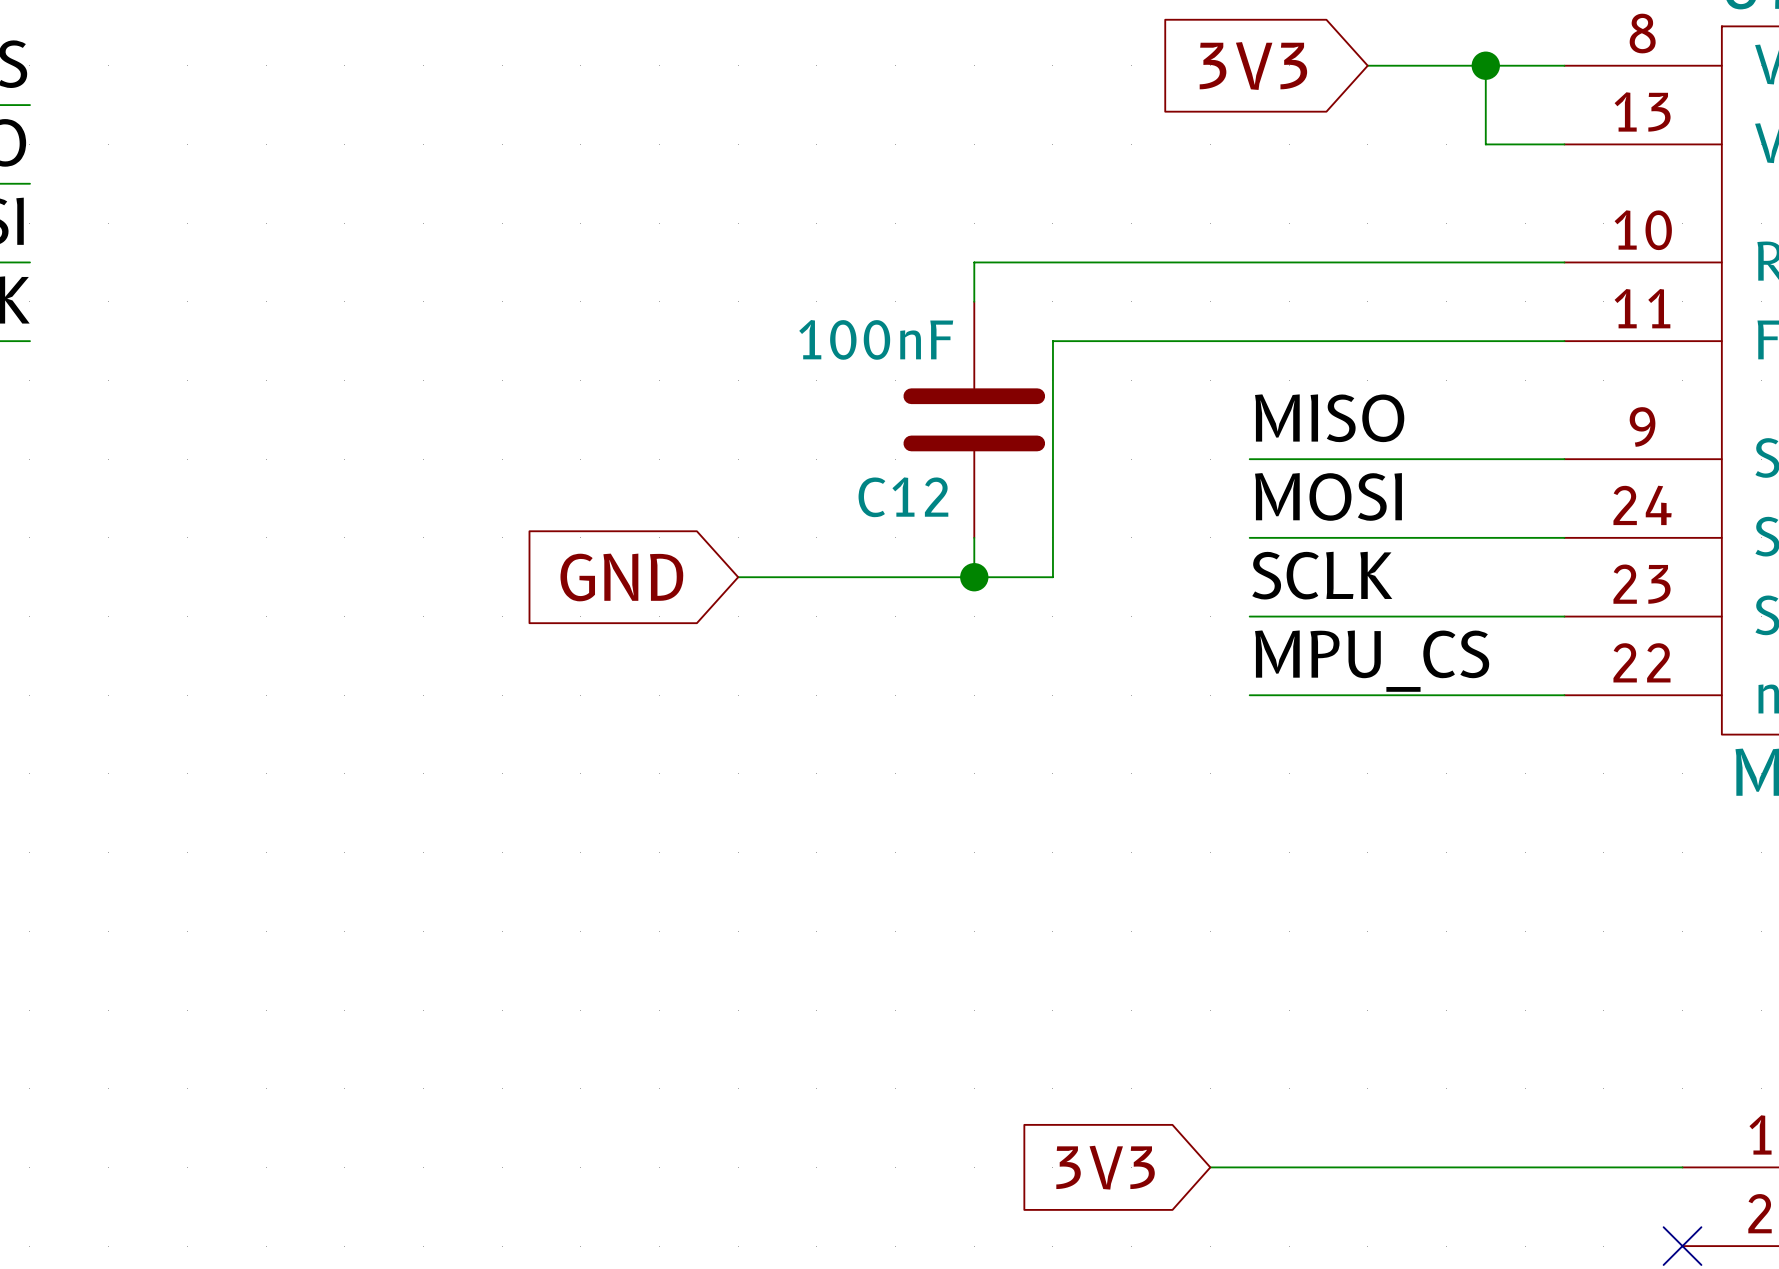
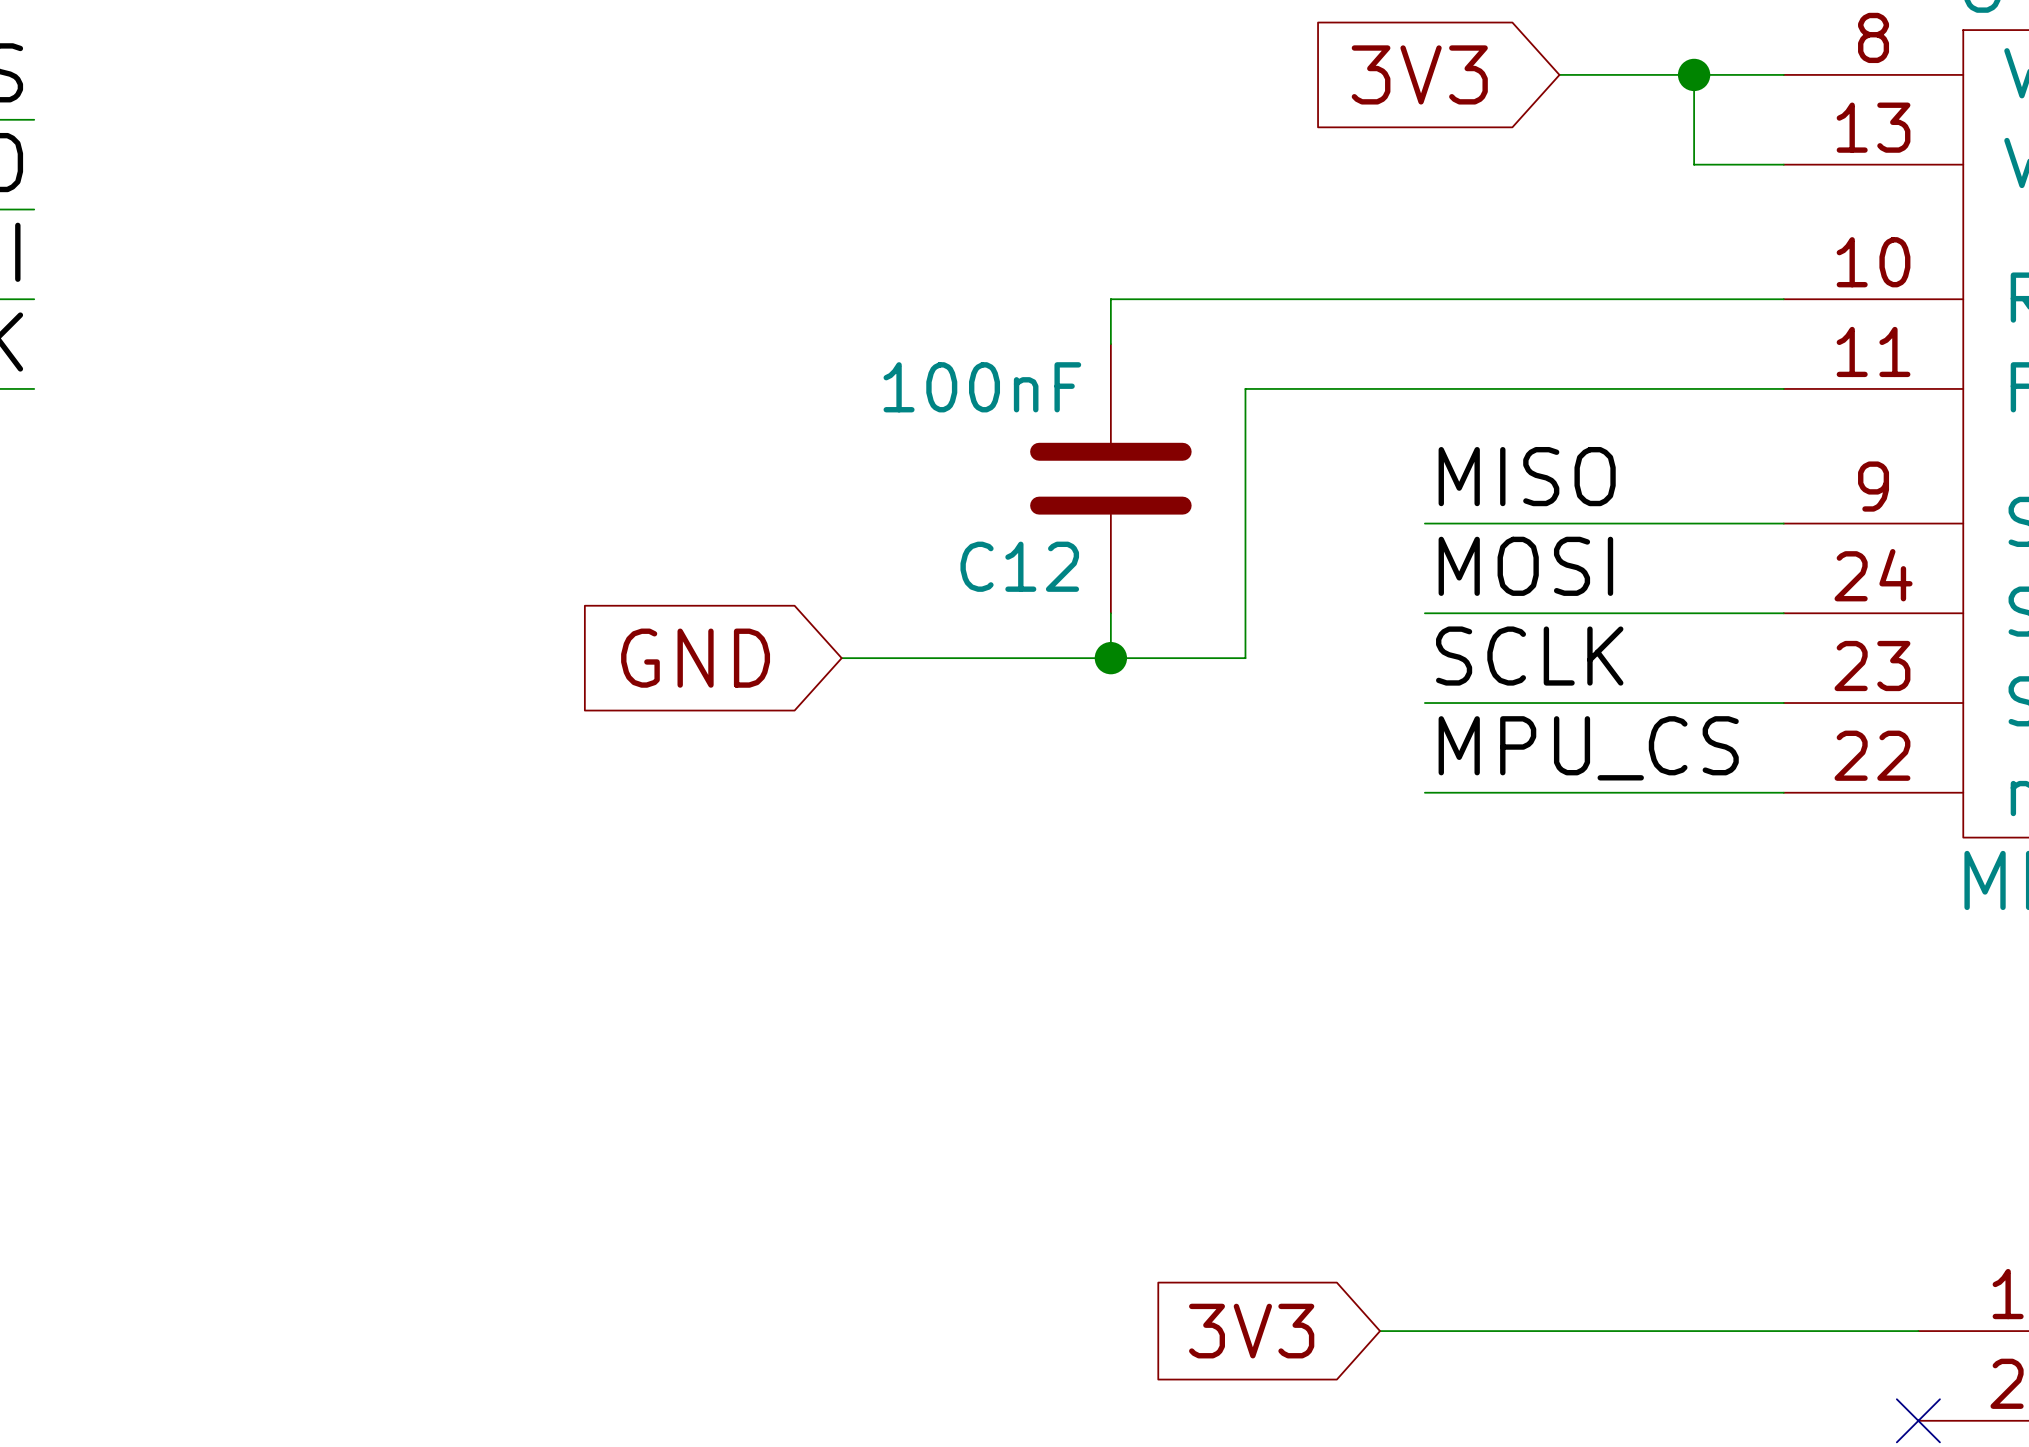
wire: (1092, 341) (1052, 341) (1052, 577) -> (1245, 388) (1245, 658) (1200, 658)

